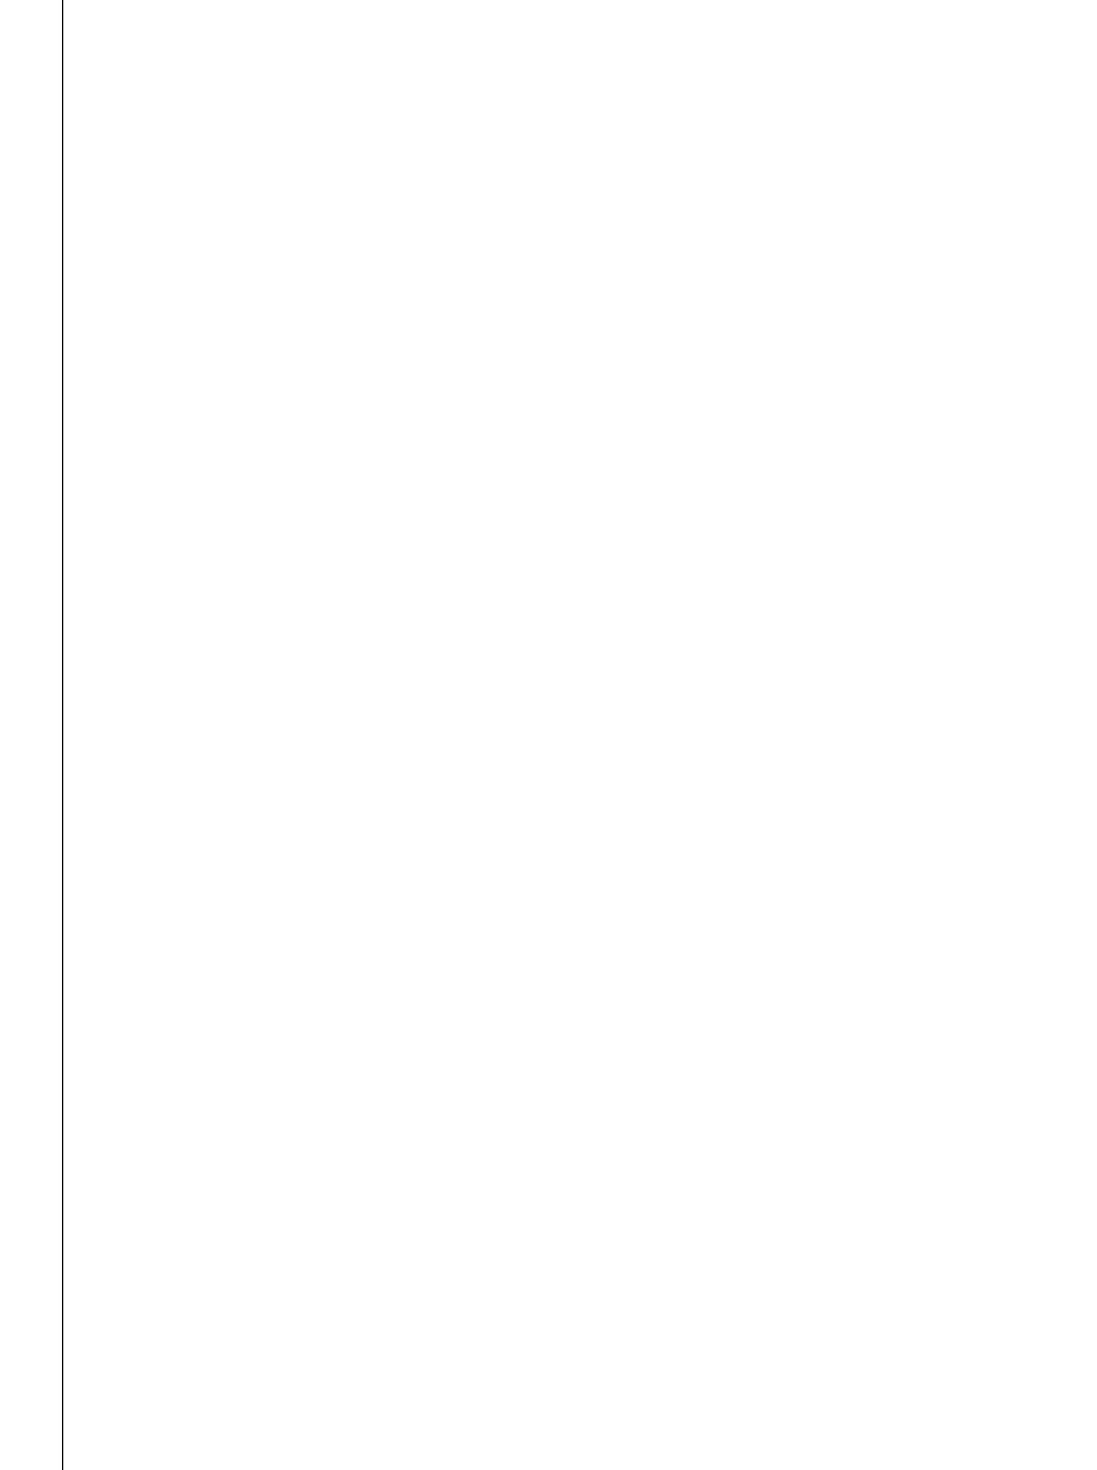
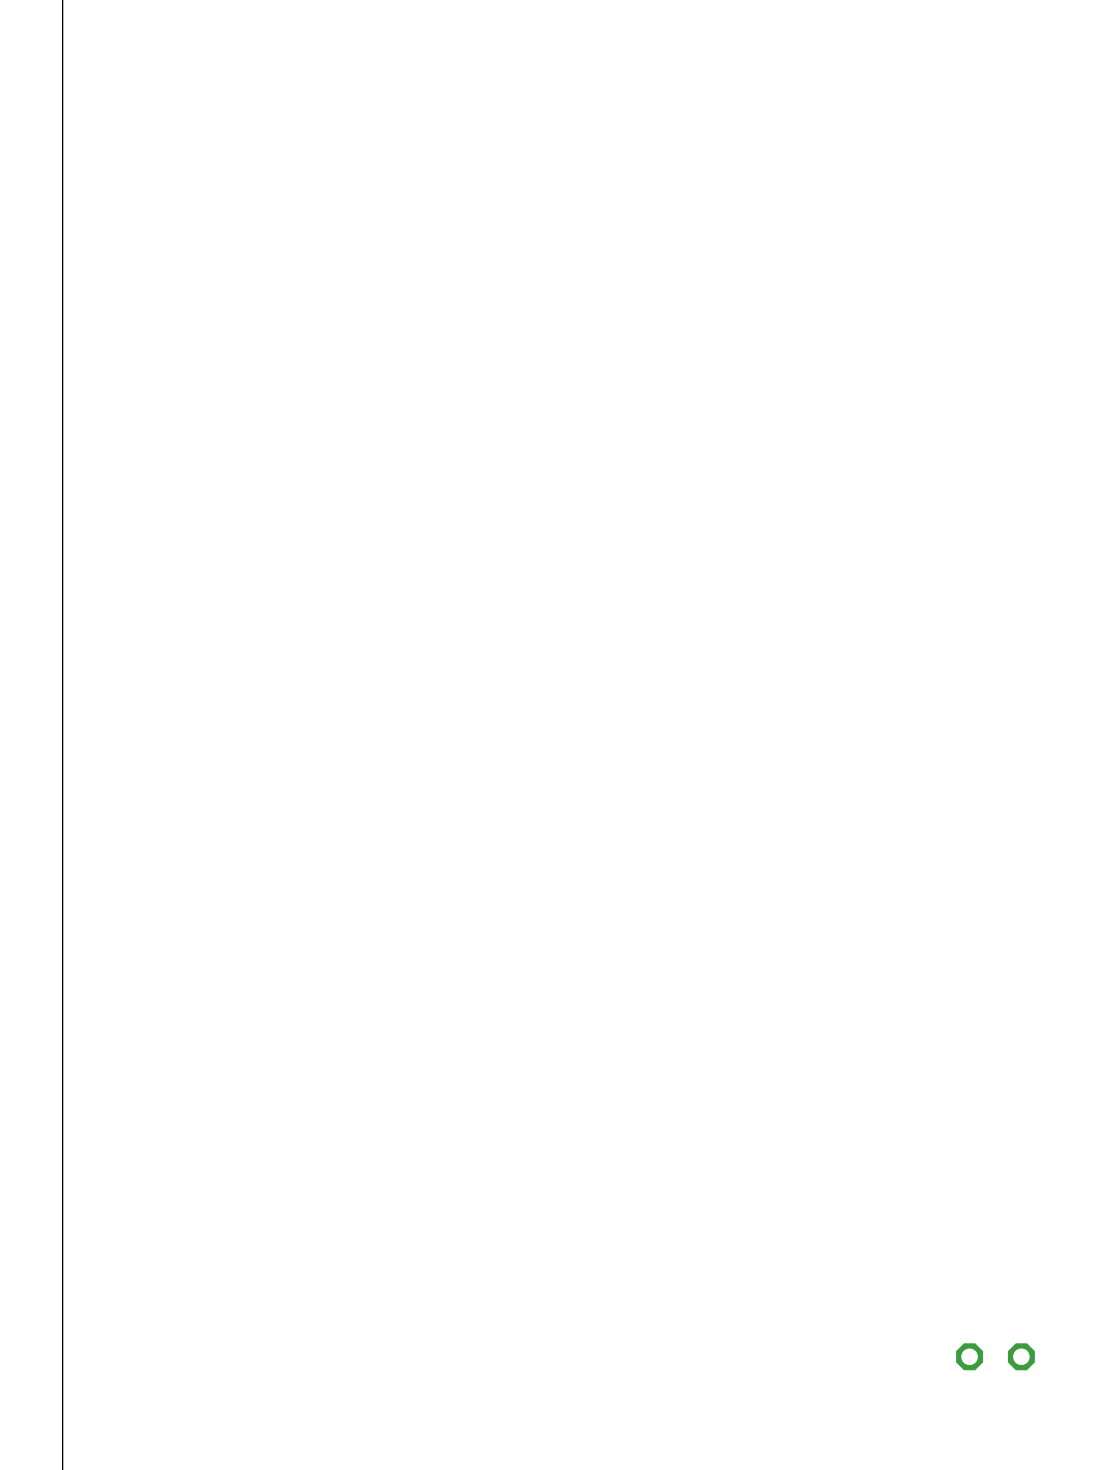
part: none -> (995, 1356)

